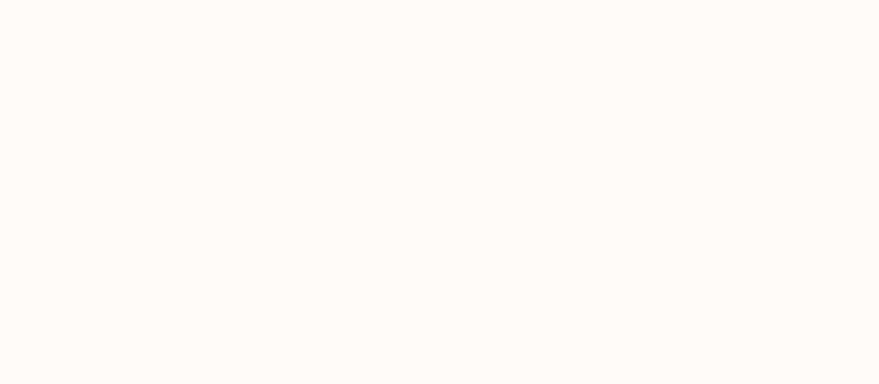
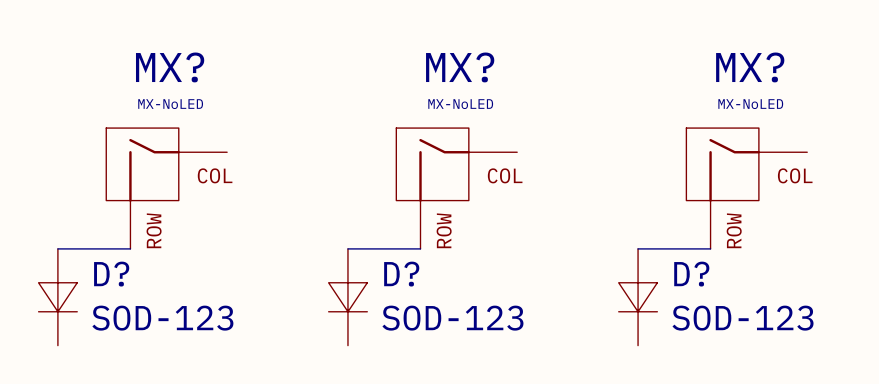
MX?: none -> MX-NoLED (166, 188)
MX?: none -> MX-NoLED (456, 188)
MX?: none -> MX-NoLED (746, 188)
wire: none -> (57, 248) (130, 248)
wire: none -> (347, 248) (420, 248)
wire: none -> (638, 248) (710, 248)
D?: none -> SOD-123 (57, 297)
D?: none -> SOD-123 (347, 297)
D?: none -> SOD-123 (638, 297)

